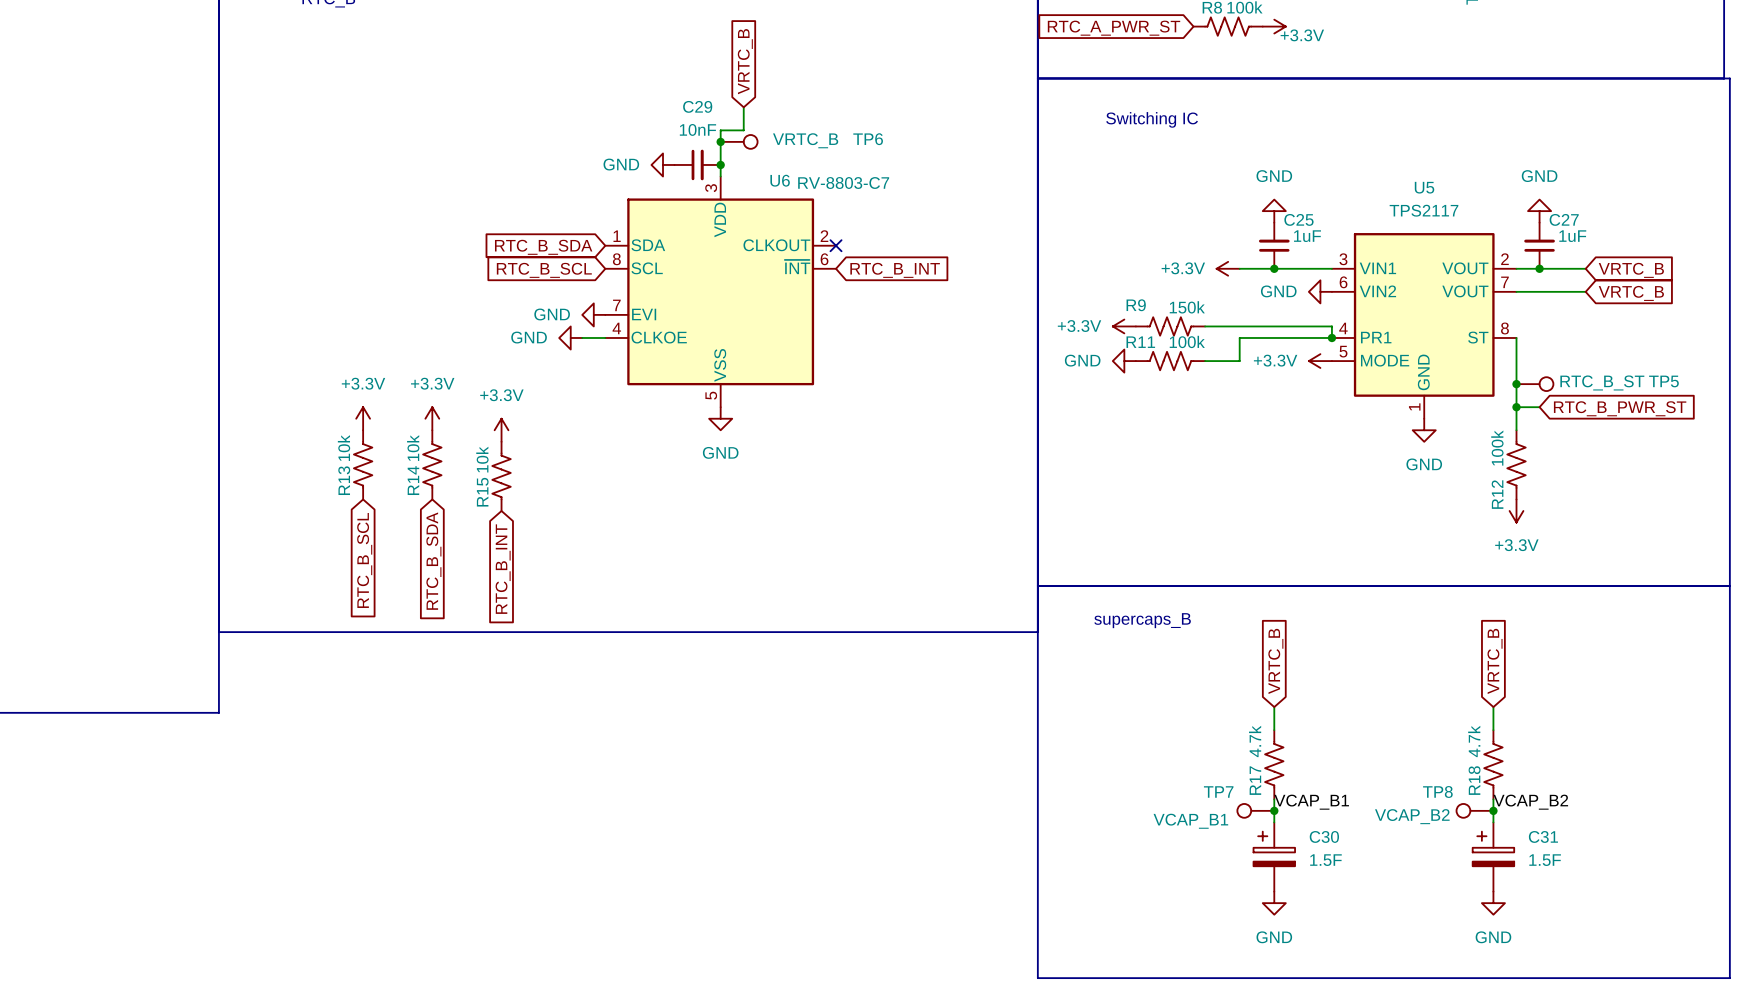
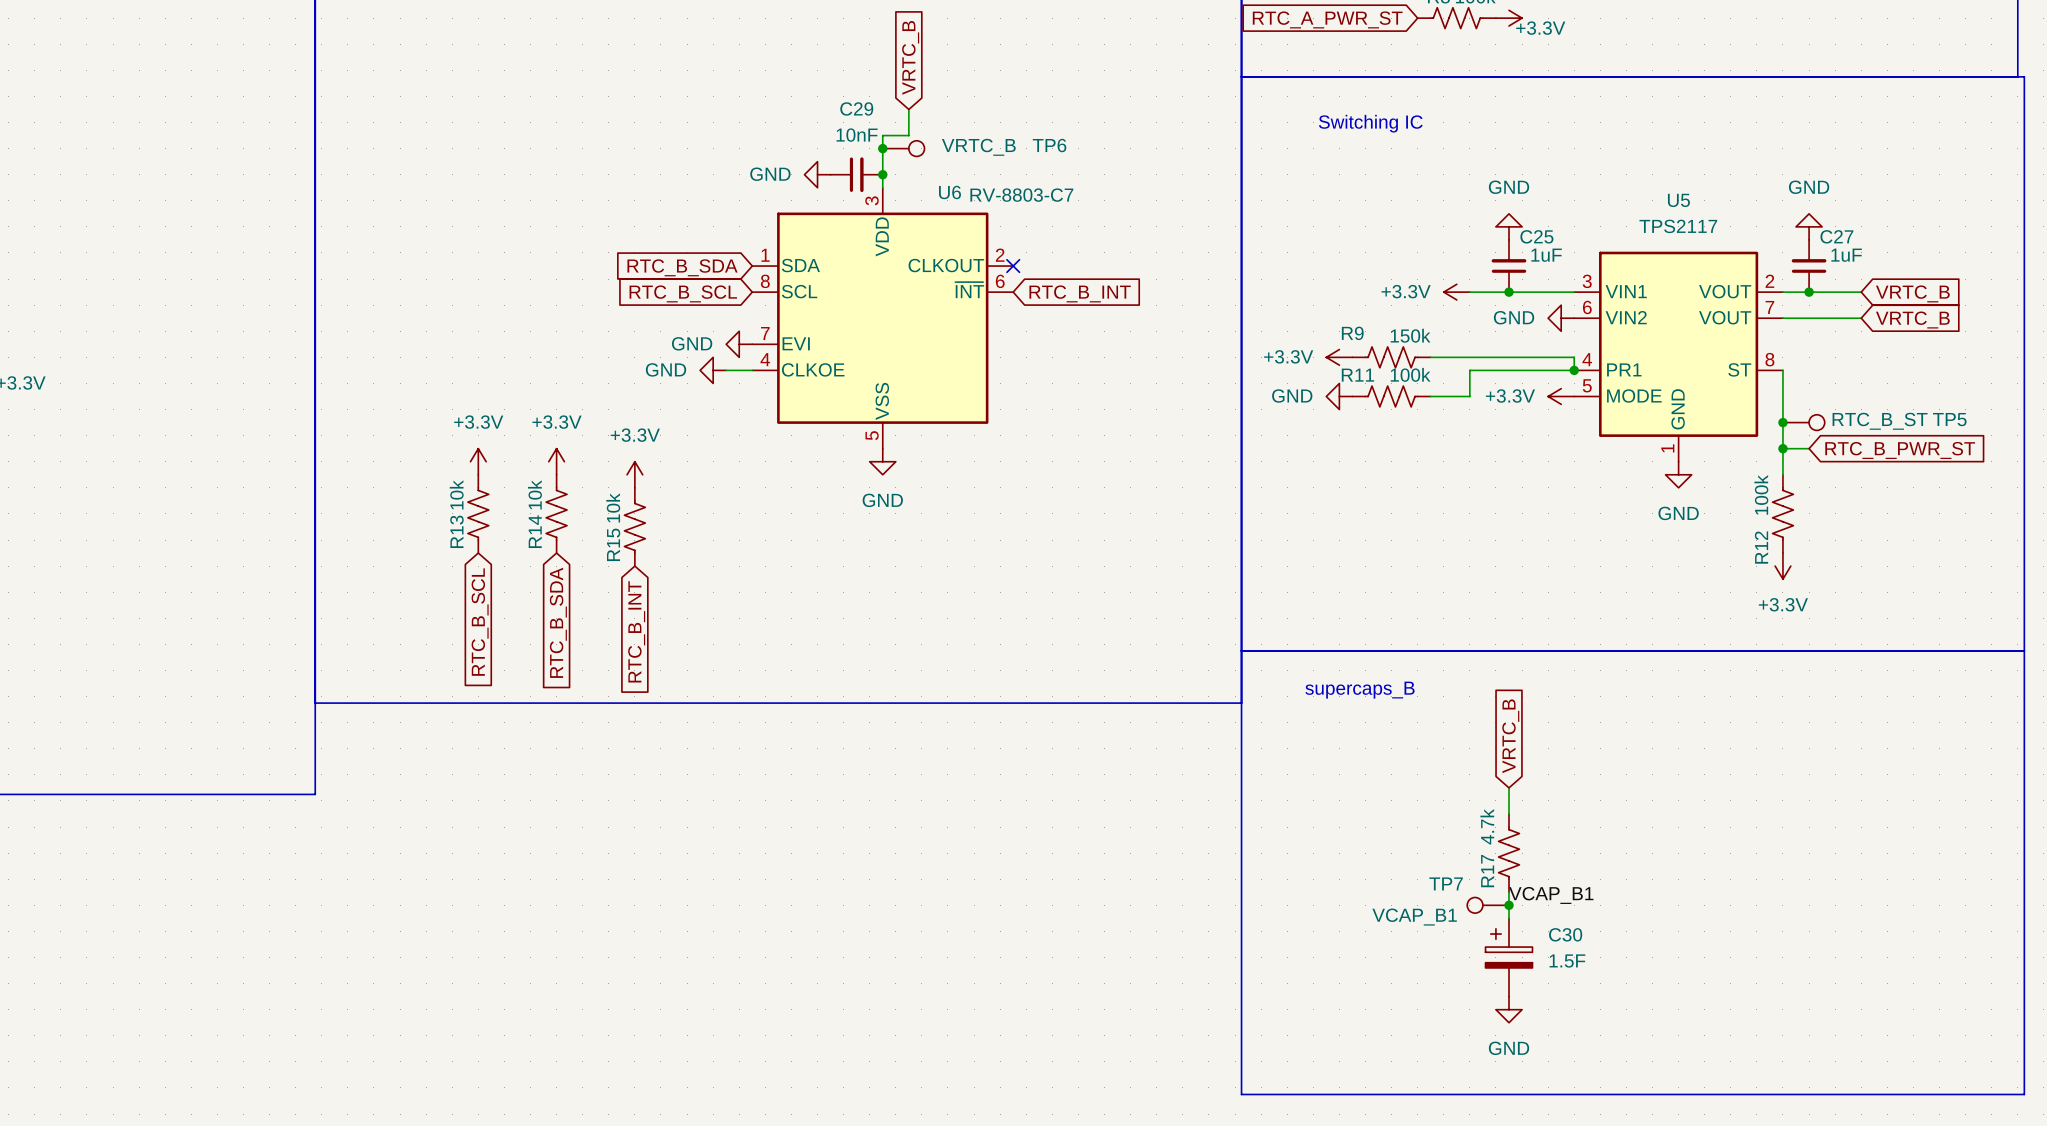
global label: VRTC_B (1495, 661) -> none
wire: (1493, 707) (1493, 730) -> none
R18: 4.7k (1493, 764) -> none
wire: (1493, 799) (1493, 822) -> none
label: VCAP_B2 (1530, 802) -> none
TP8: VCAP_B2 (1474, 810) -> none
junction: (1493, 810) -> none
C31: 1.5F (1493, 857) -> none
power symbol: GND (1493, 903) -> none

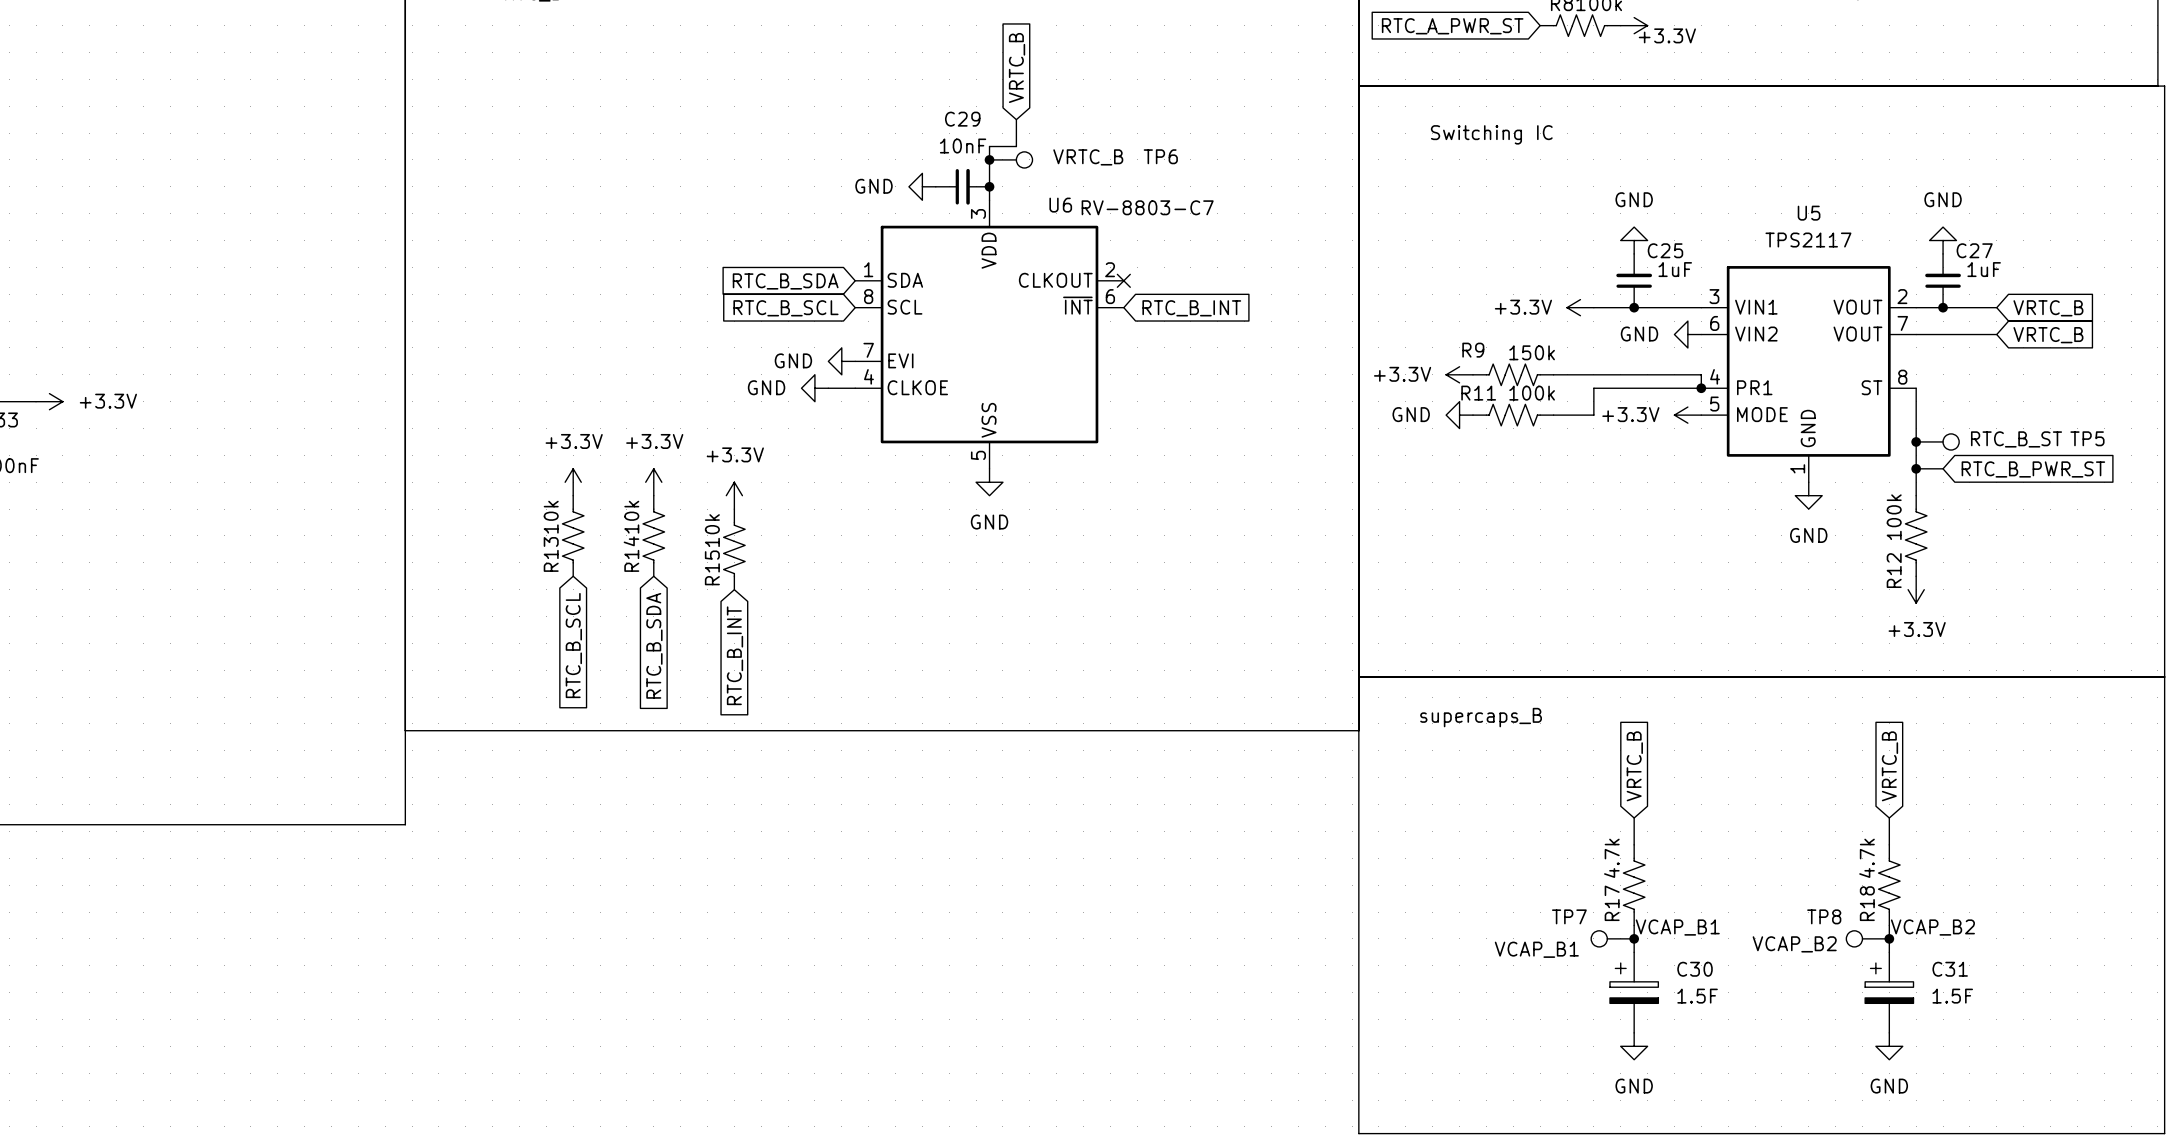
global label: none -> VRTC_B (1889, 766)
wire: none -> (1889, 818) (1889, 844)
R18: none -> 4.7k (1889, 885)
wire: none -> (1889, 925) (1889, 952)
label: none -> VCAP_B2 (1932, 927)
TP8: none -> VCAP_B2 (1867, 938)
junction: none -> (1889, 938)
C31: none -> 1.5F (1889, 992)
power symbol: none -> GND (1889, 1046)

